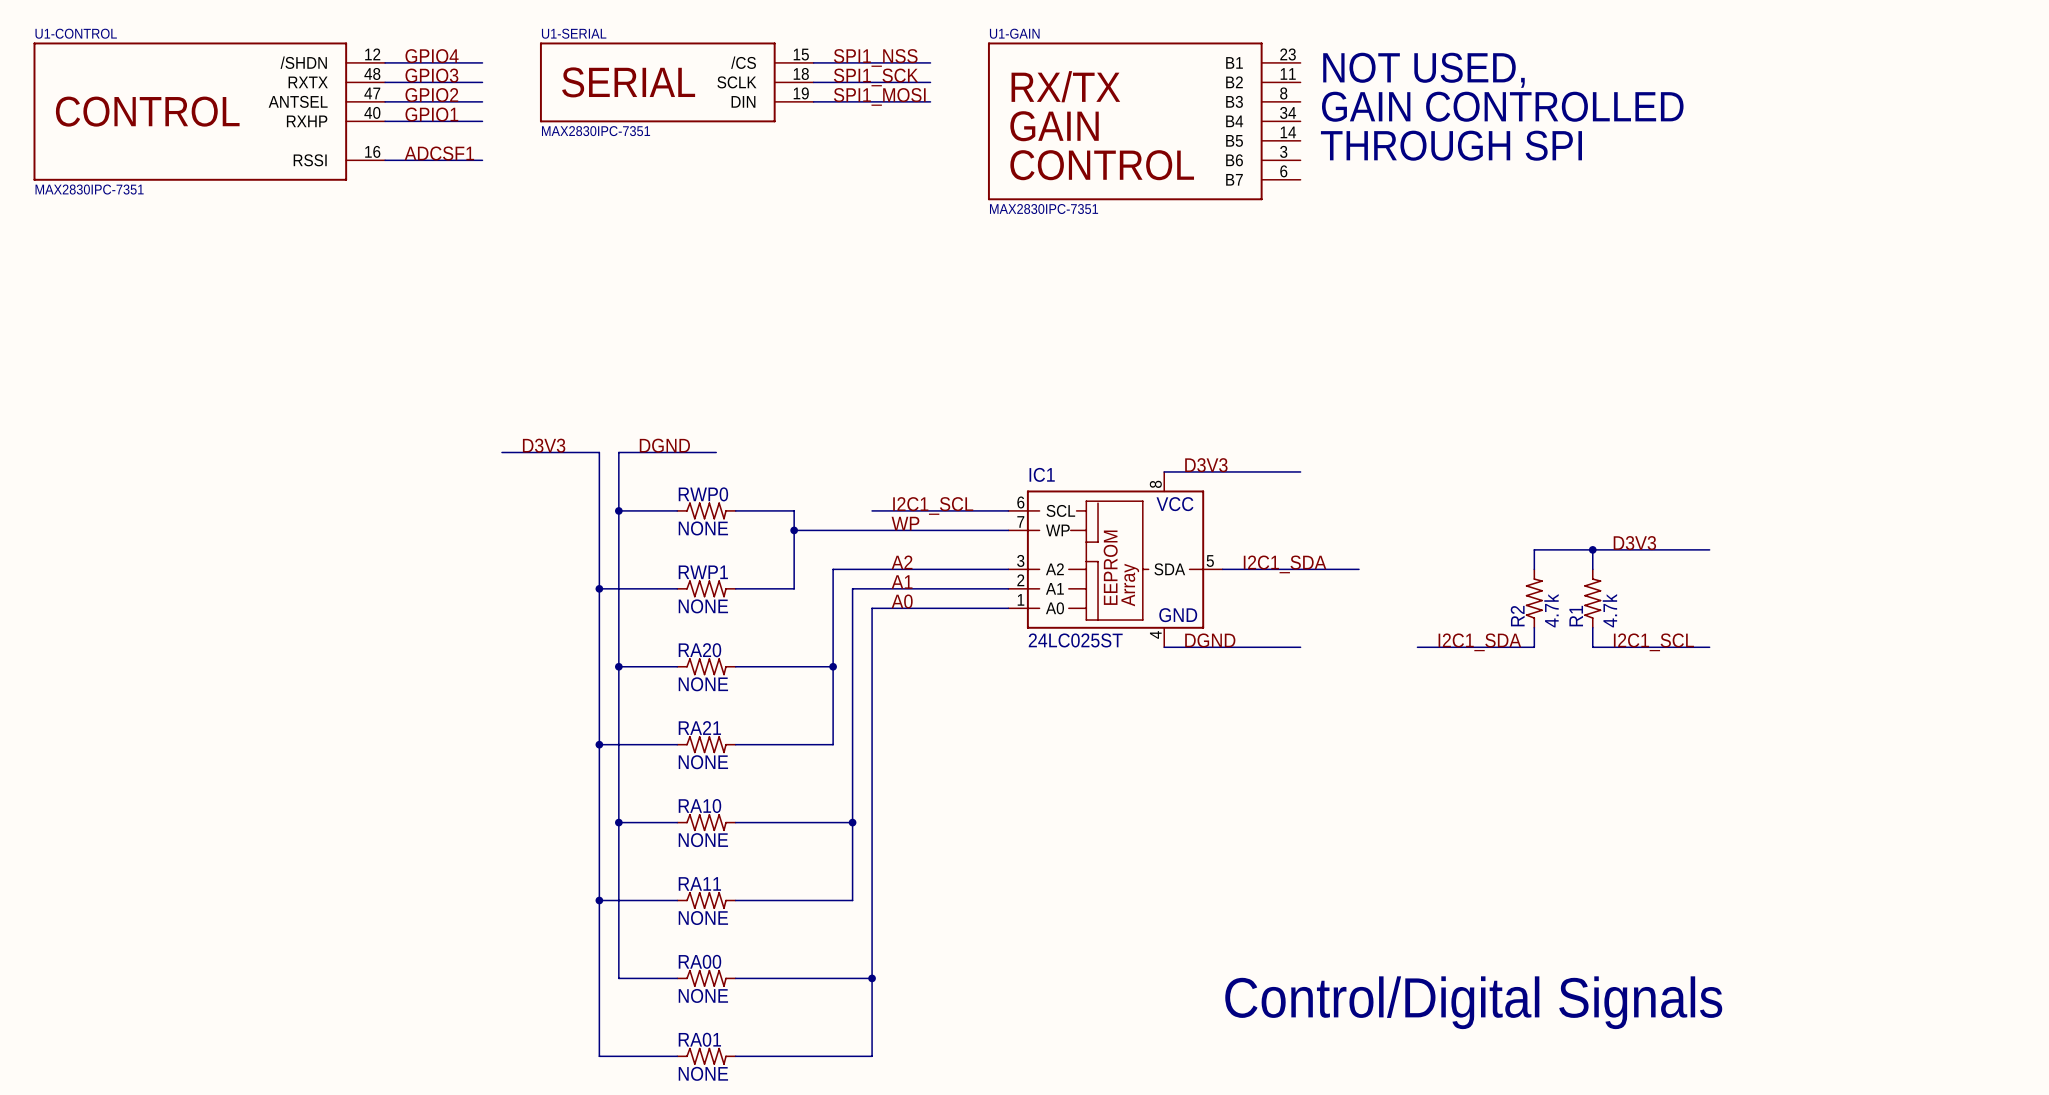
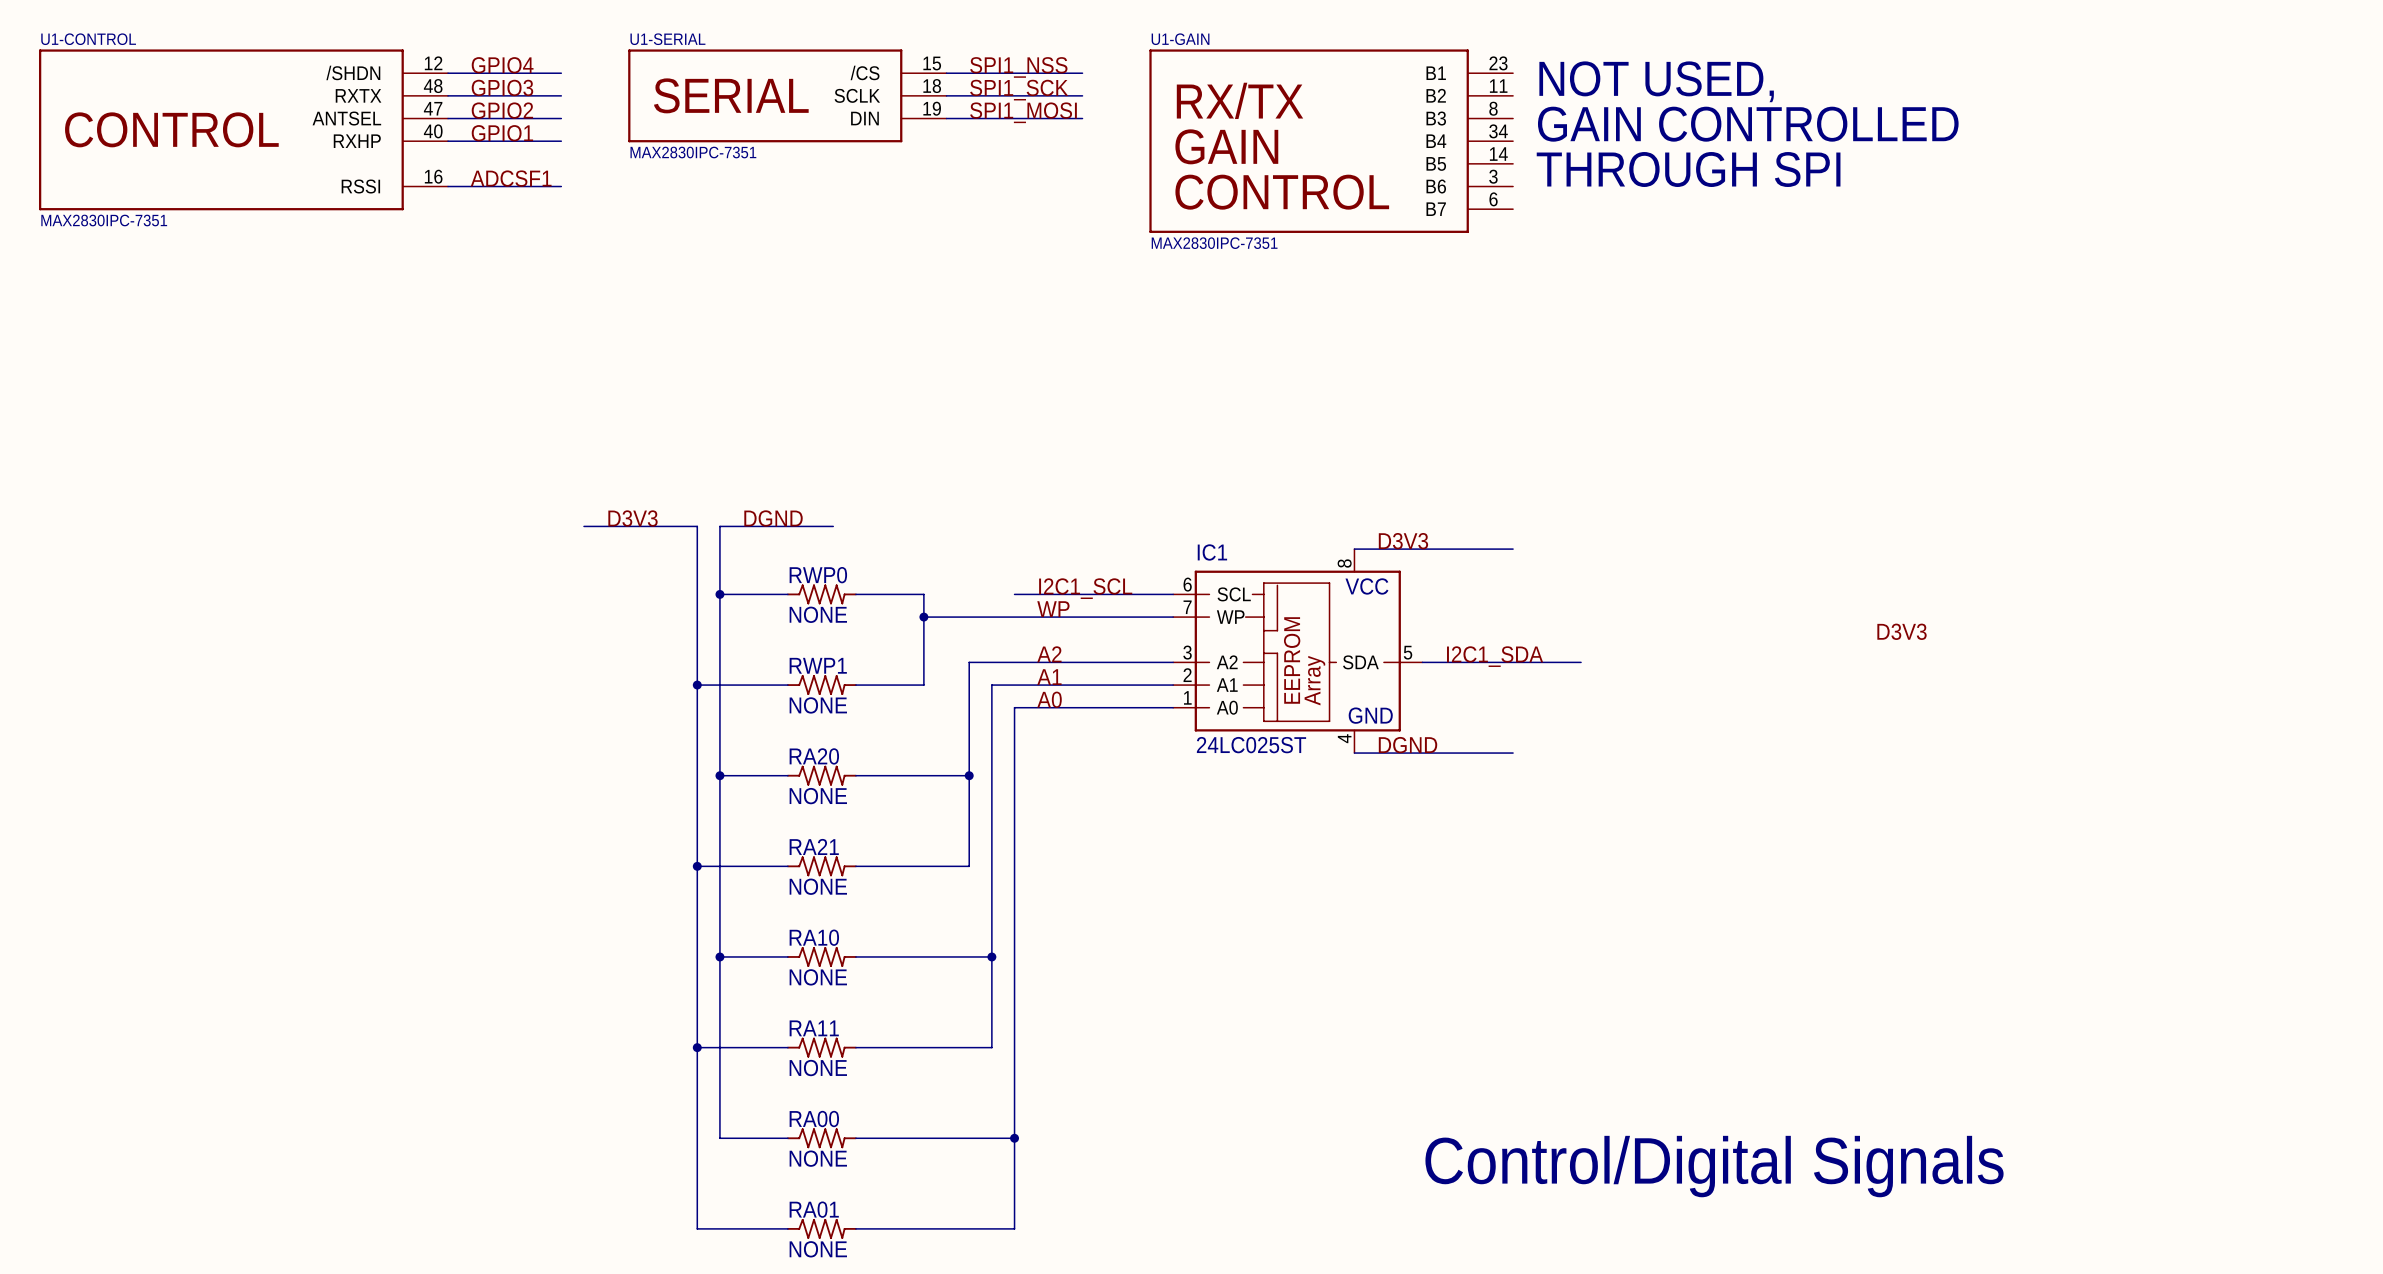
wire: (1592, 549) (1592, 569) -> none
junction: (1592, 549) -> none
wire: (1709, 549) (1534, 549) (1534, 569) -> none
R2: 4.7k (1534, 598) -> none
R1: 4.7k (1592, 598) -> none
wire: (1534, 627) (1534, 647) (1417, 647) -> none
wire: (1592, 627) (1592, 647) (1709, 647) -> none
label: I2C1_SDA (1479, 642) -> none
label: I2C1_SCL (1653, 642) -> none

